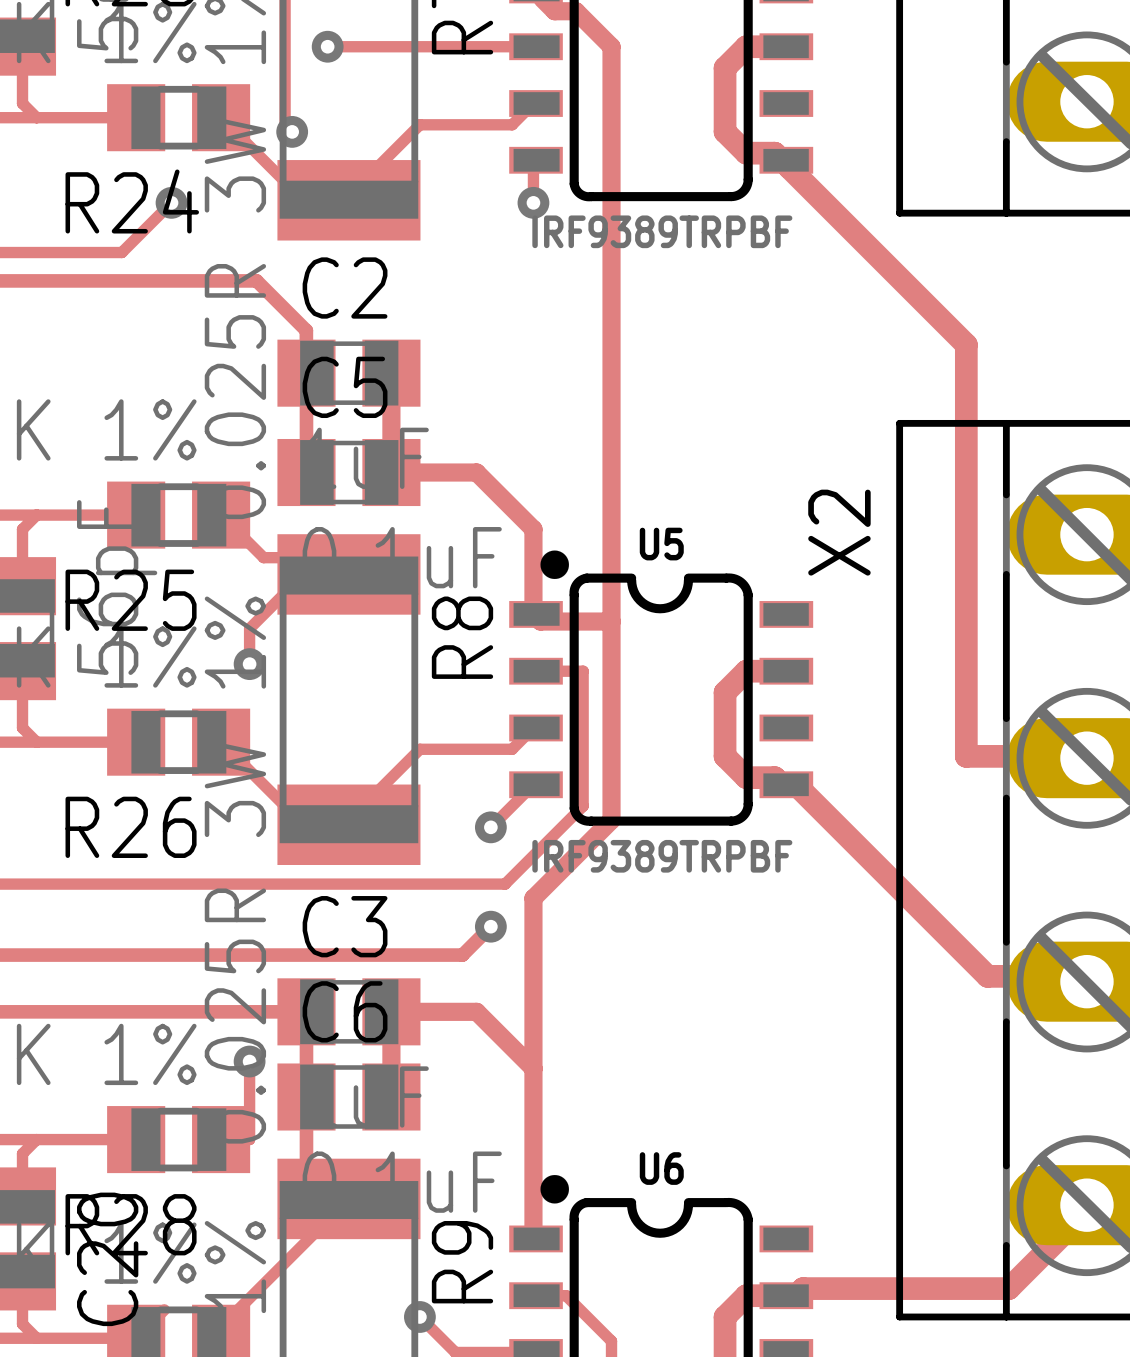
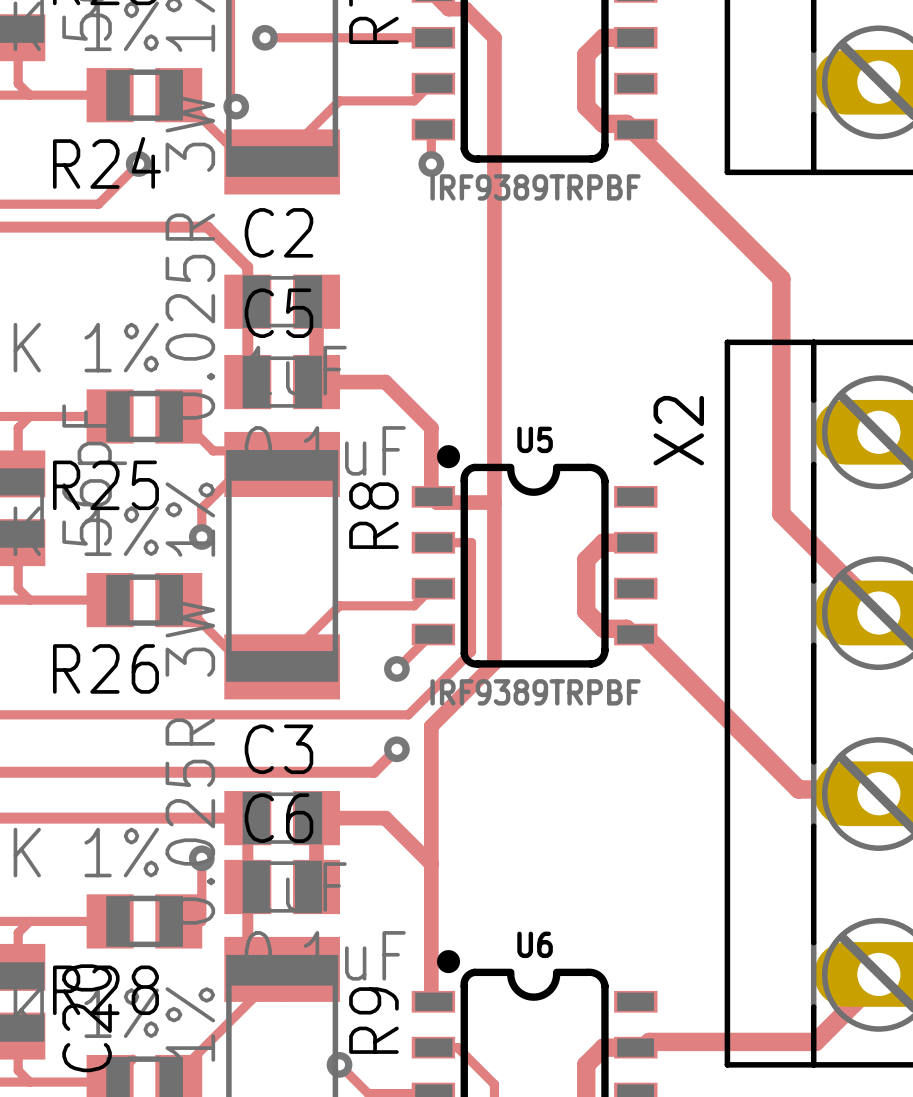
track: (966, 635) (966, 756) (1086, 756) -> (781, 514) (878, 611)

